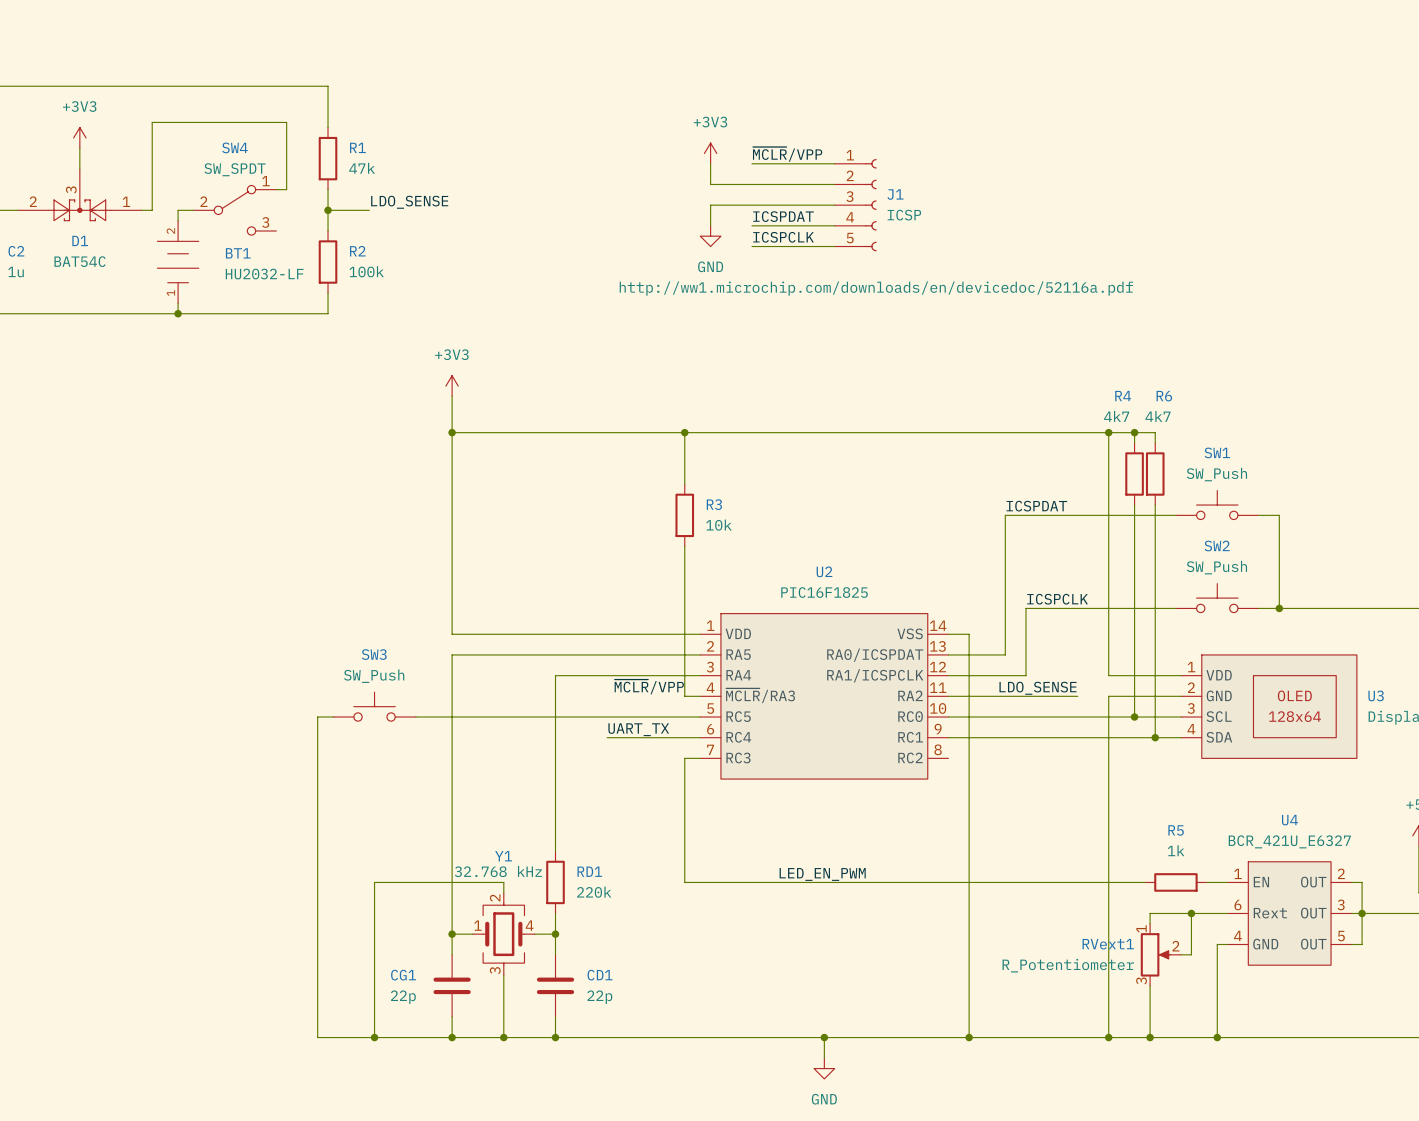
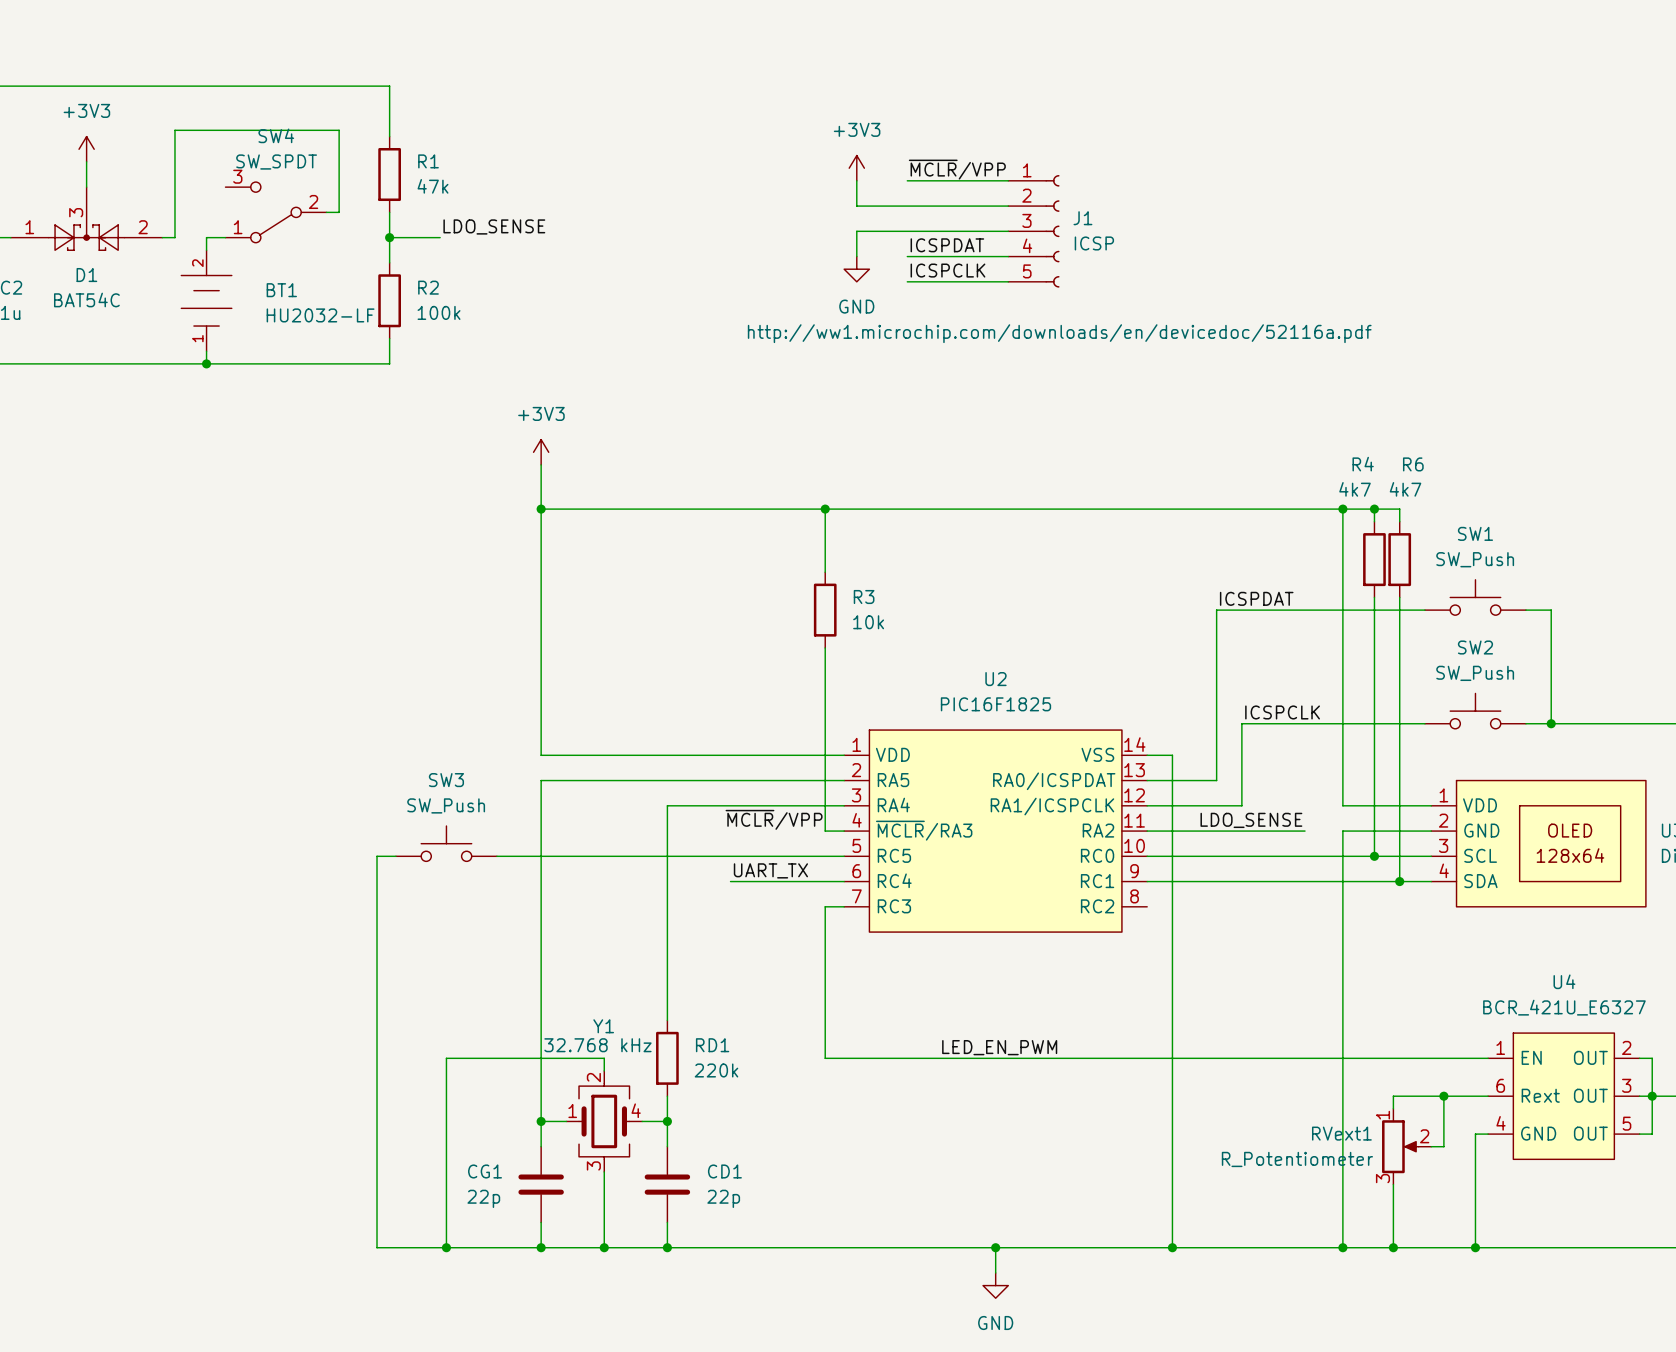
D1 flip: as is (79, 210) -> left-right (86, 237)
SW4 rotation: 0° (234, 210) -> 180° (275, 212)
wire: none -> (1387, 1058) (1462, 1058)
R5: 1k (1175, 882) -> none

